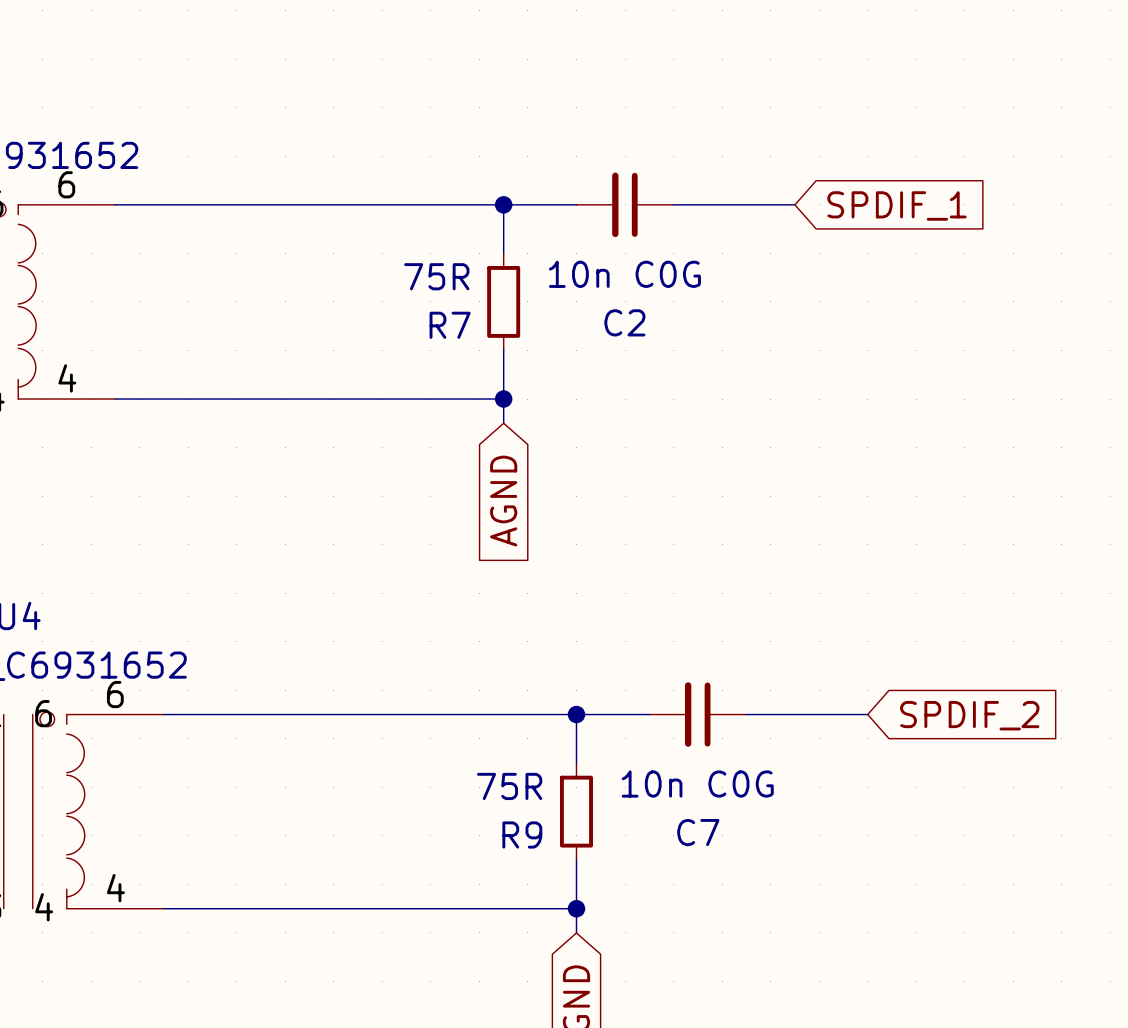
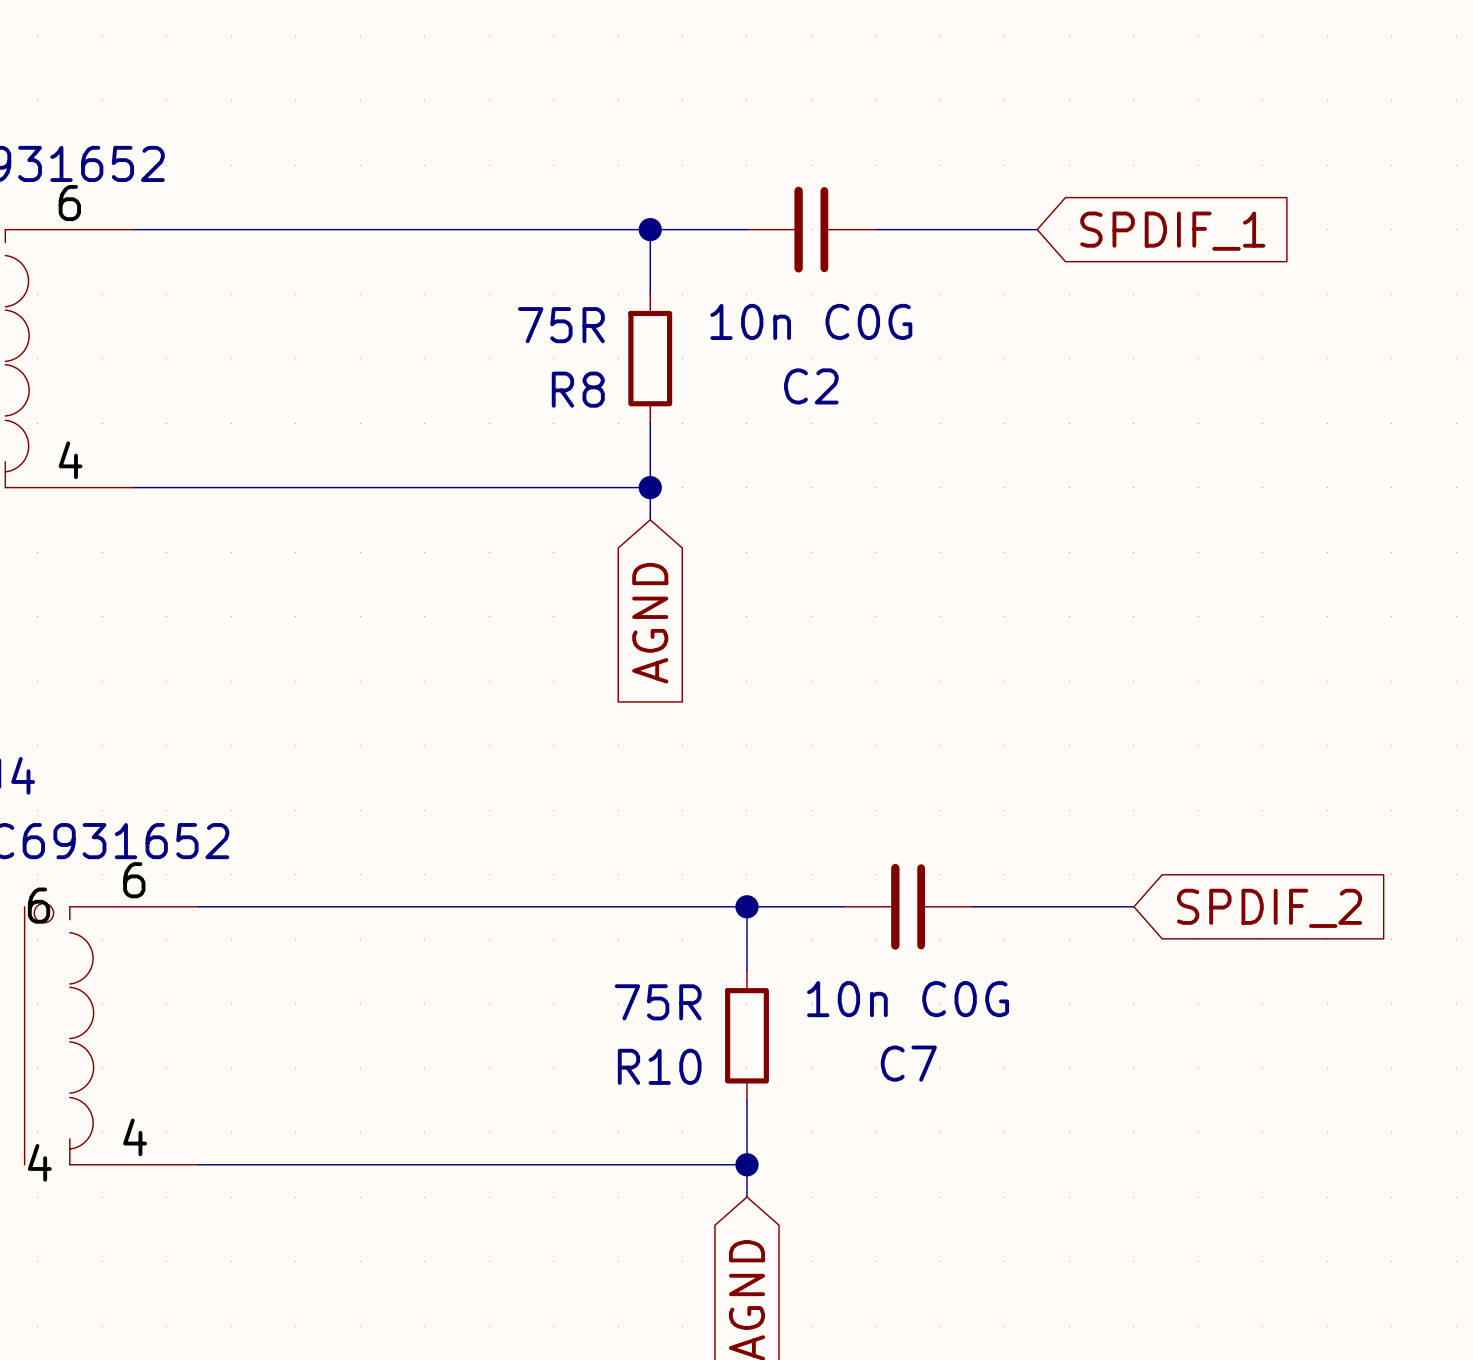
R7 name: R7 (450, 325) -> R8 (578, 389)
R9 name: R9 (522, 835) -> R10 (659, 1066)

